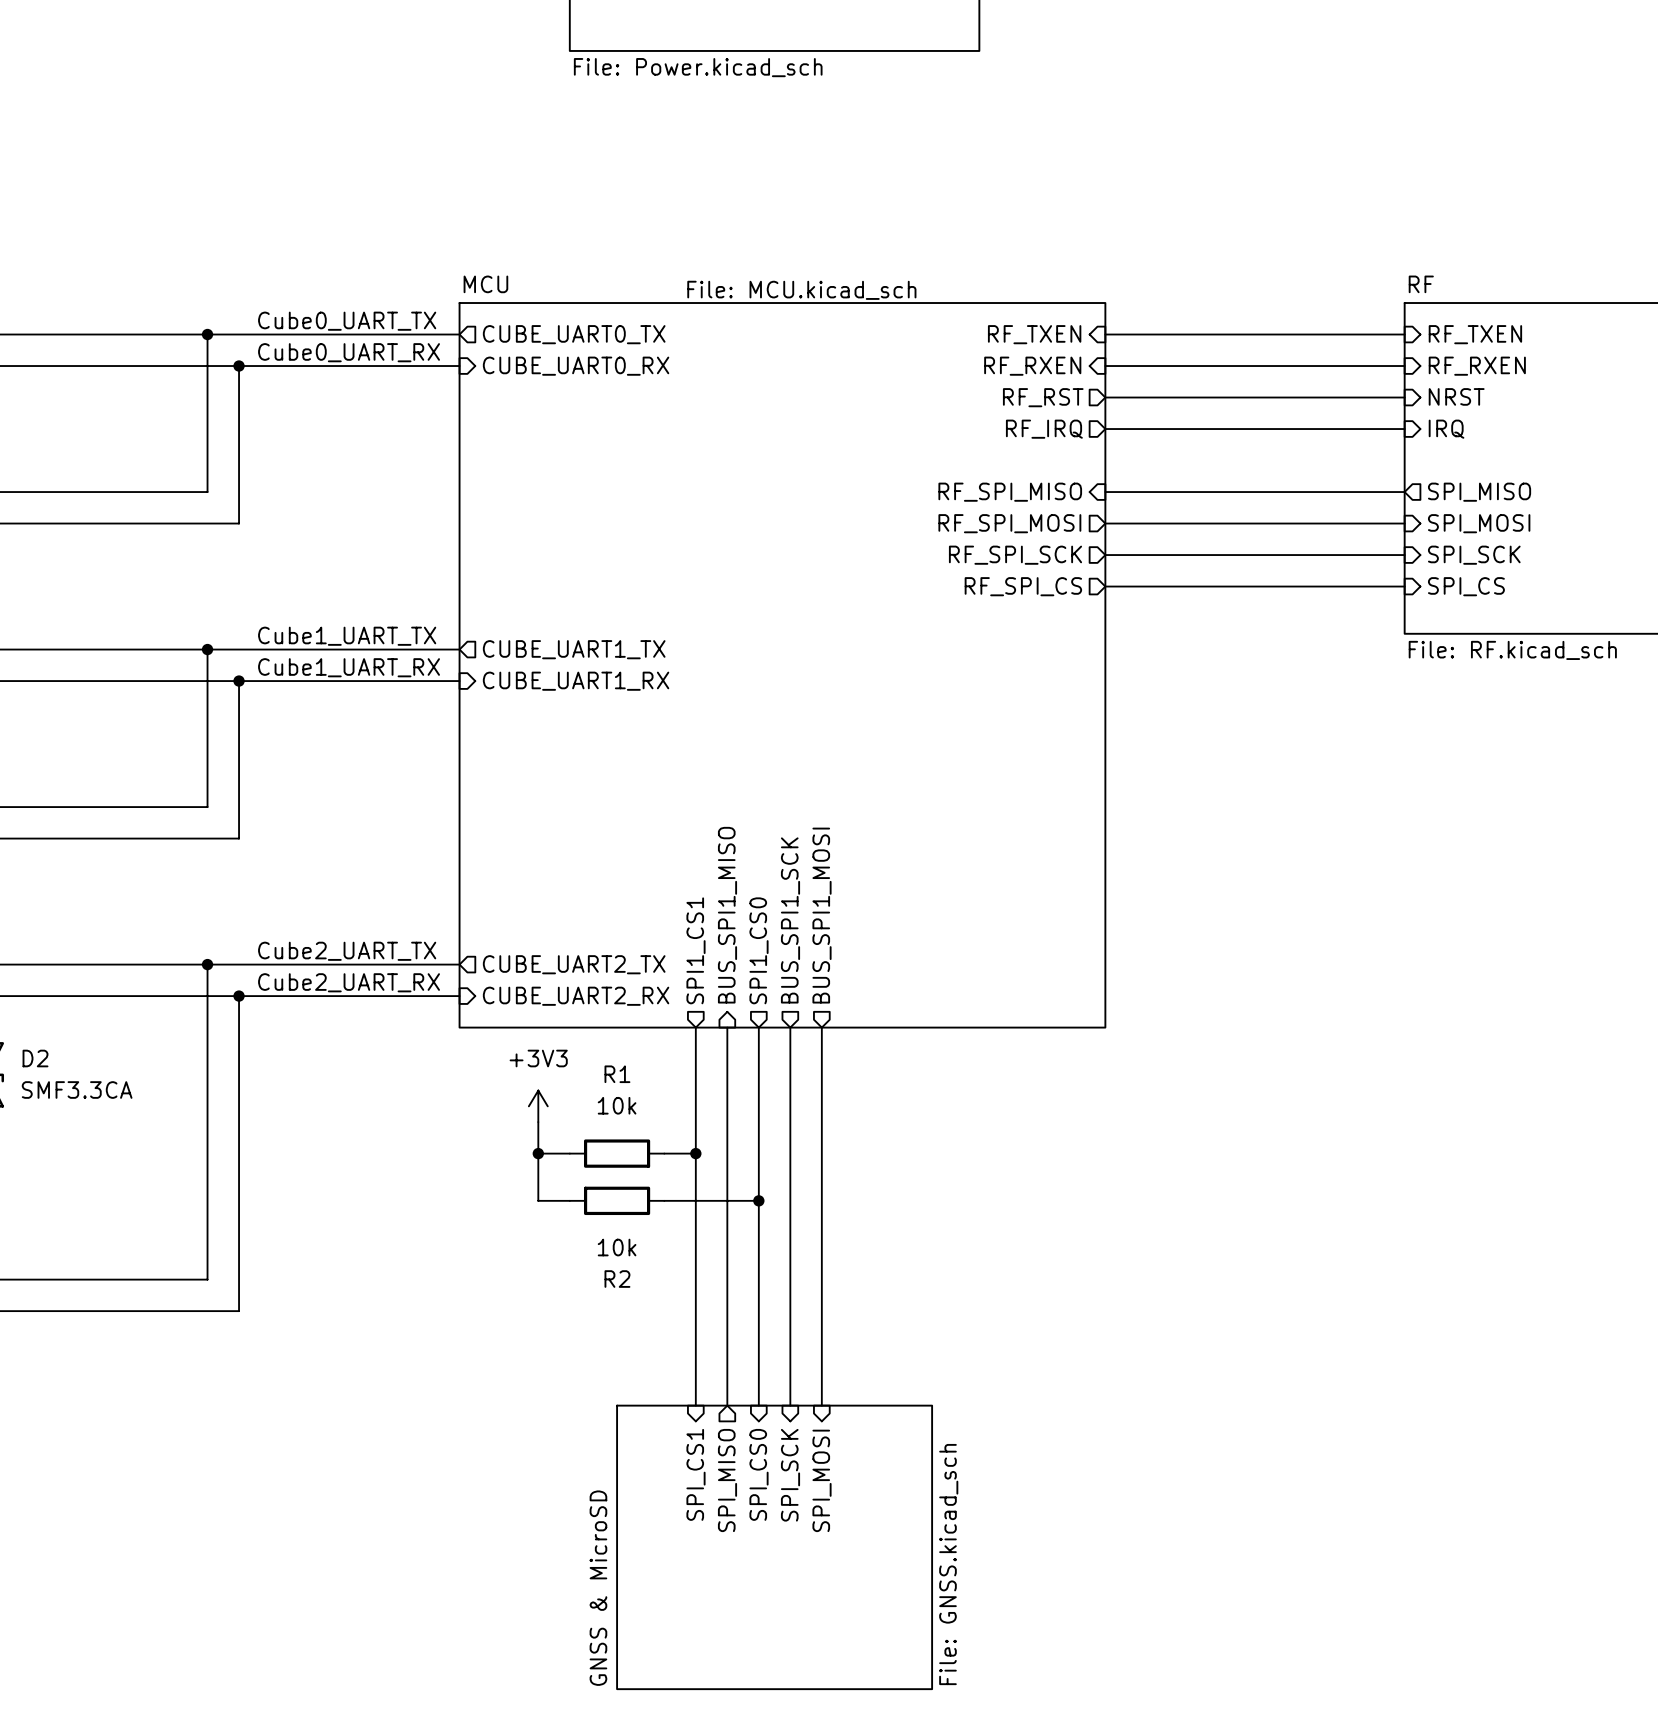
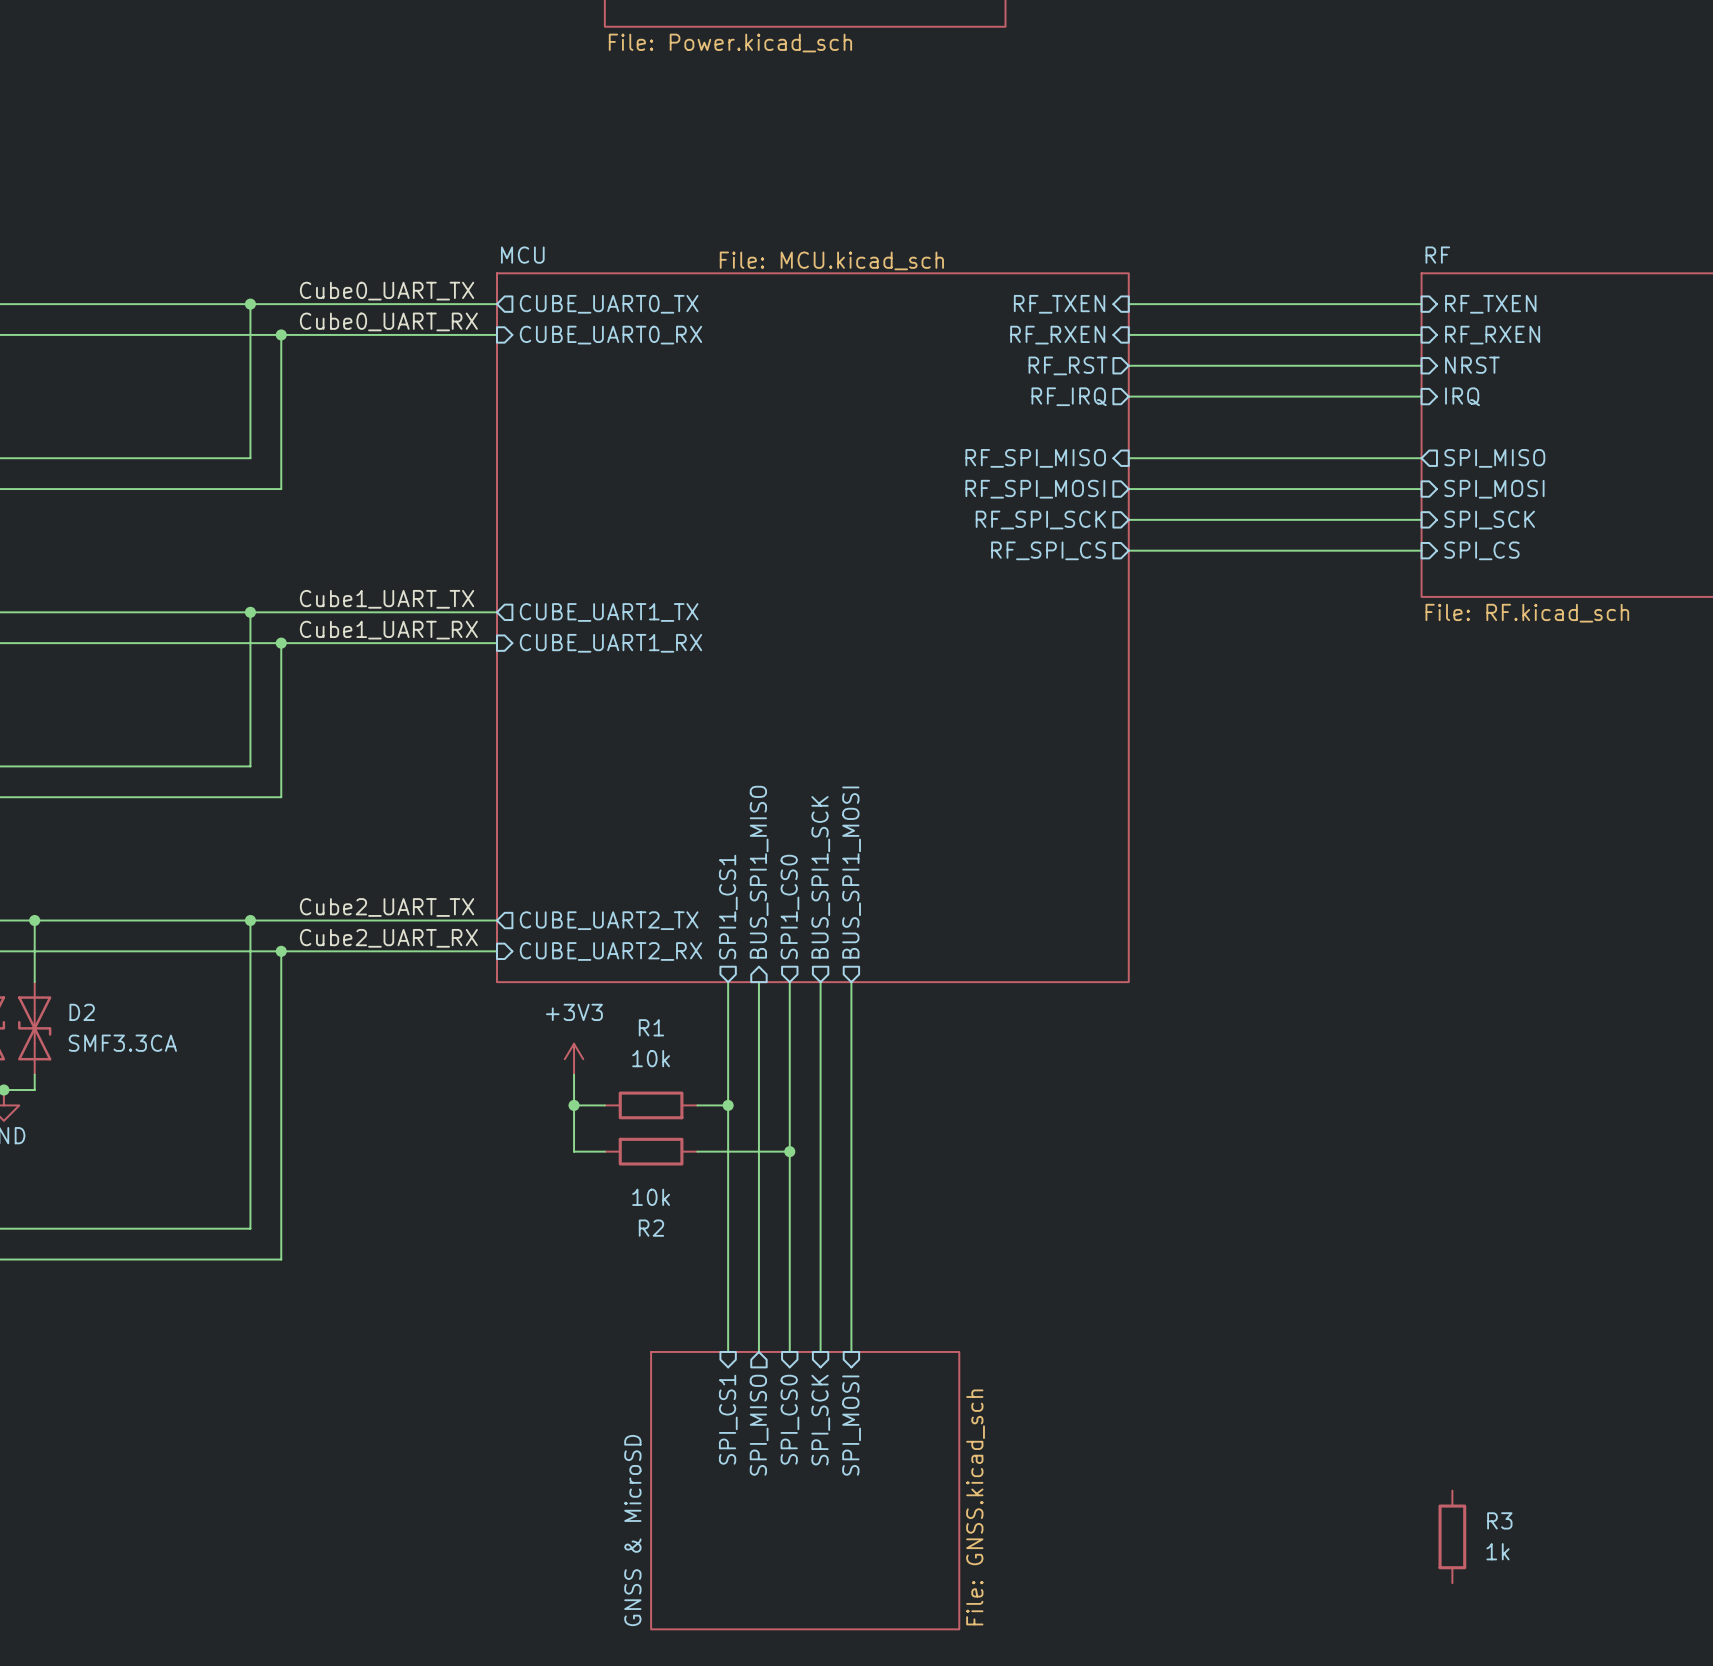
R3: none -> 1k (1452, 1536)

